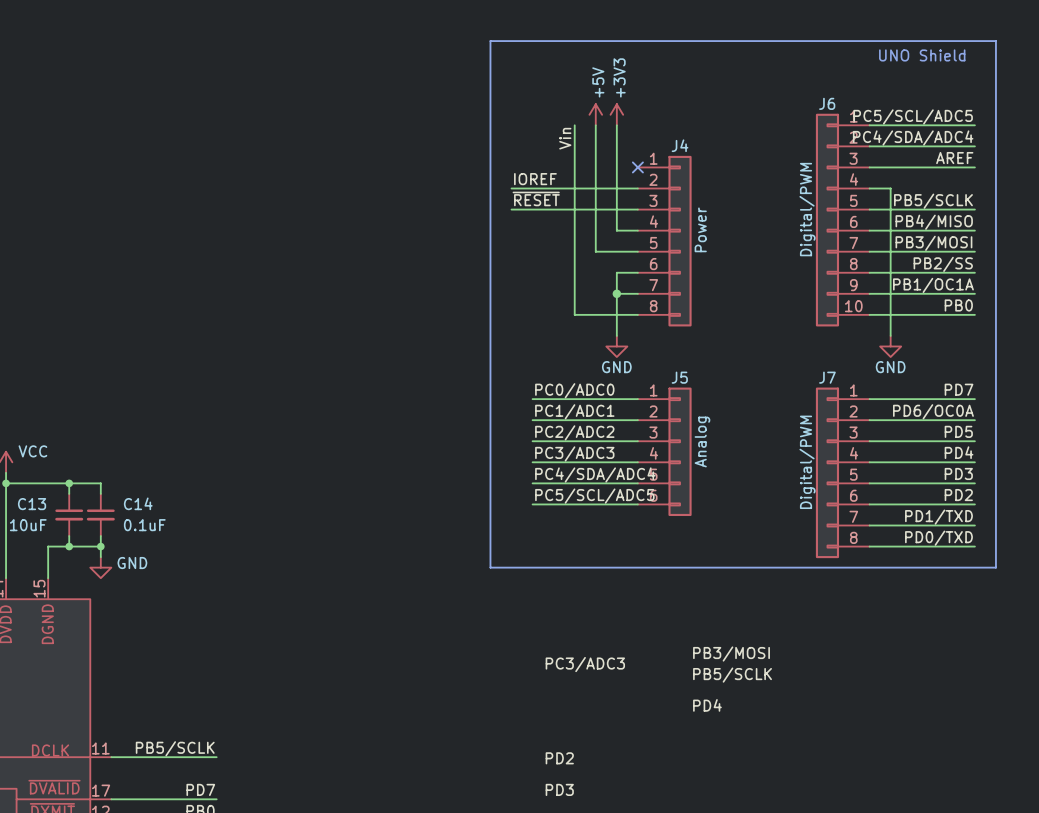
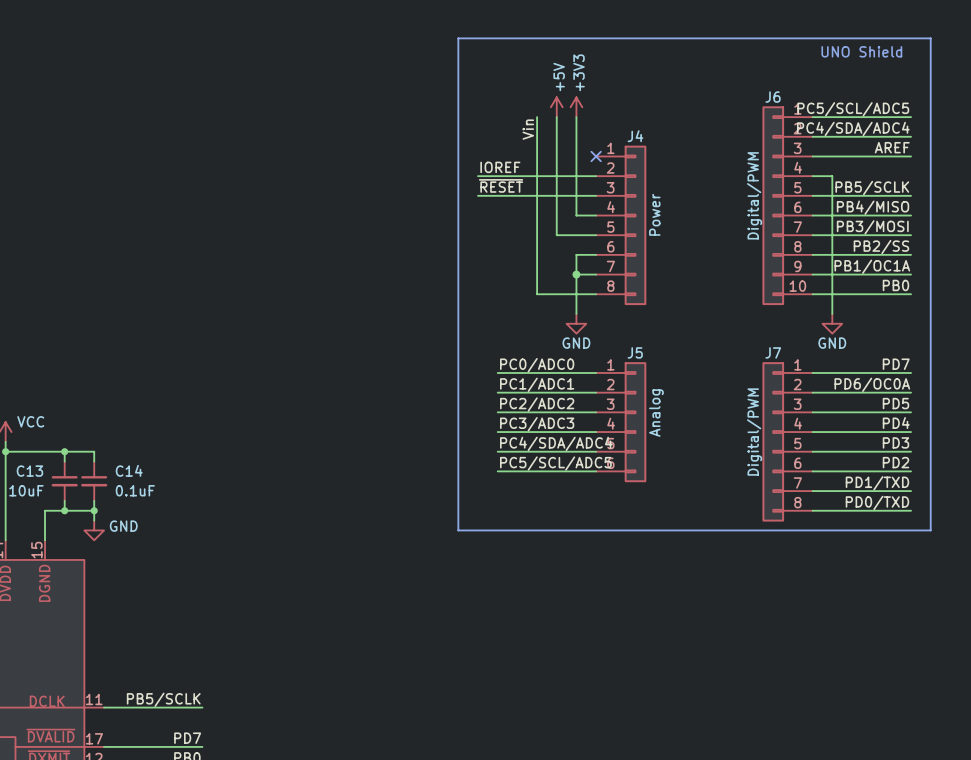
label: PB3/MOSI (731, 654) -> none
label: PC3/ADC3 (585, 664) -> none
label: PB5/SCLK (732, 675) -> none
label: PD4 (707, 705) -> none
label: PD2 (559, 758) -> none
label: PD3 (559, 789) -> none

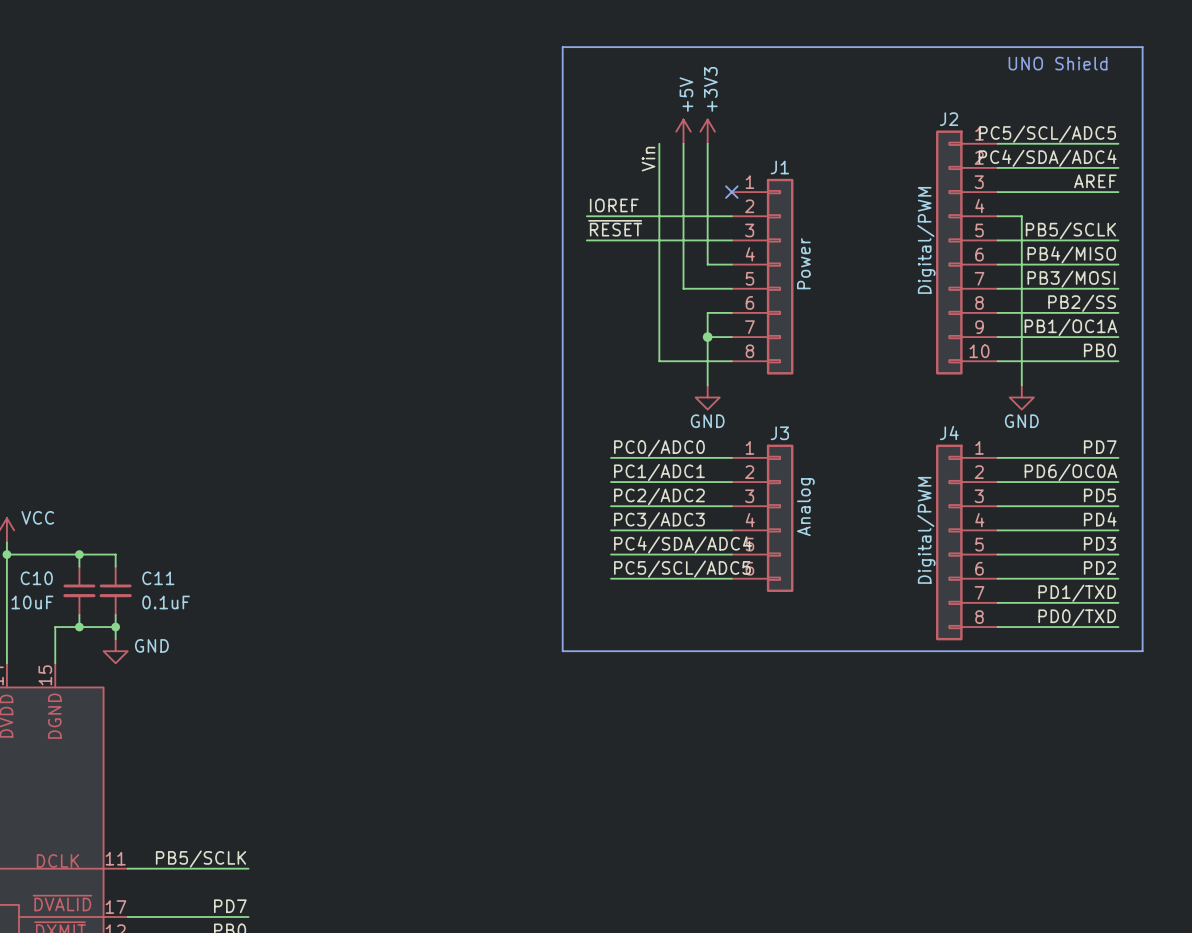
J6 name: J6 (773, 97) -> J2 (949, 119)
J4 name: J4 (635, 136) -> J1 (779, 167)
J5 name: J5 (635, 352) -> J3 (779, 433)
J7 name: J7 (773, 352) -> J4 (949, 432)
C14 name: C14 (129, 470) -> C11 (158, 578)
C13 name: C13 (29, 471) -> C10 (36, 578)

